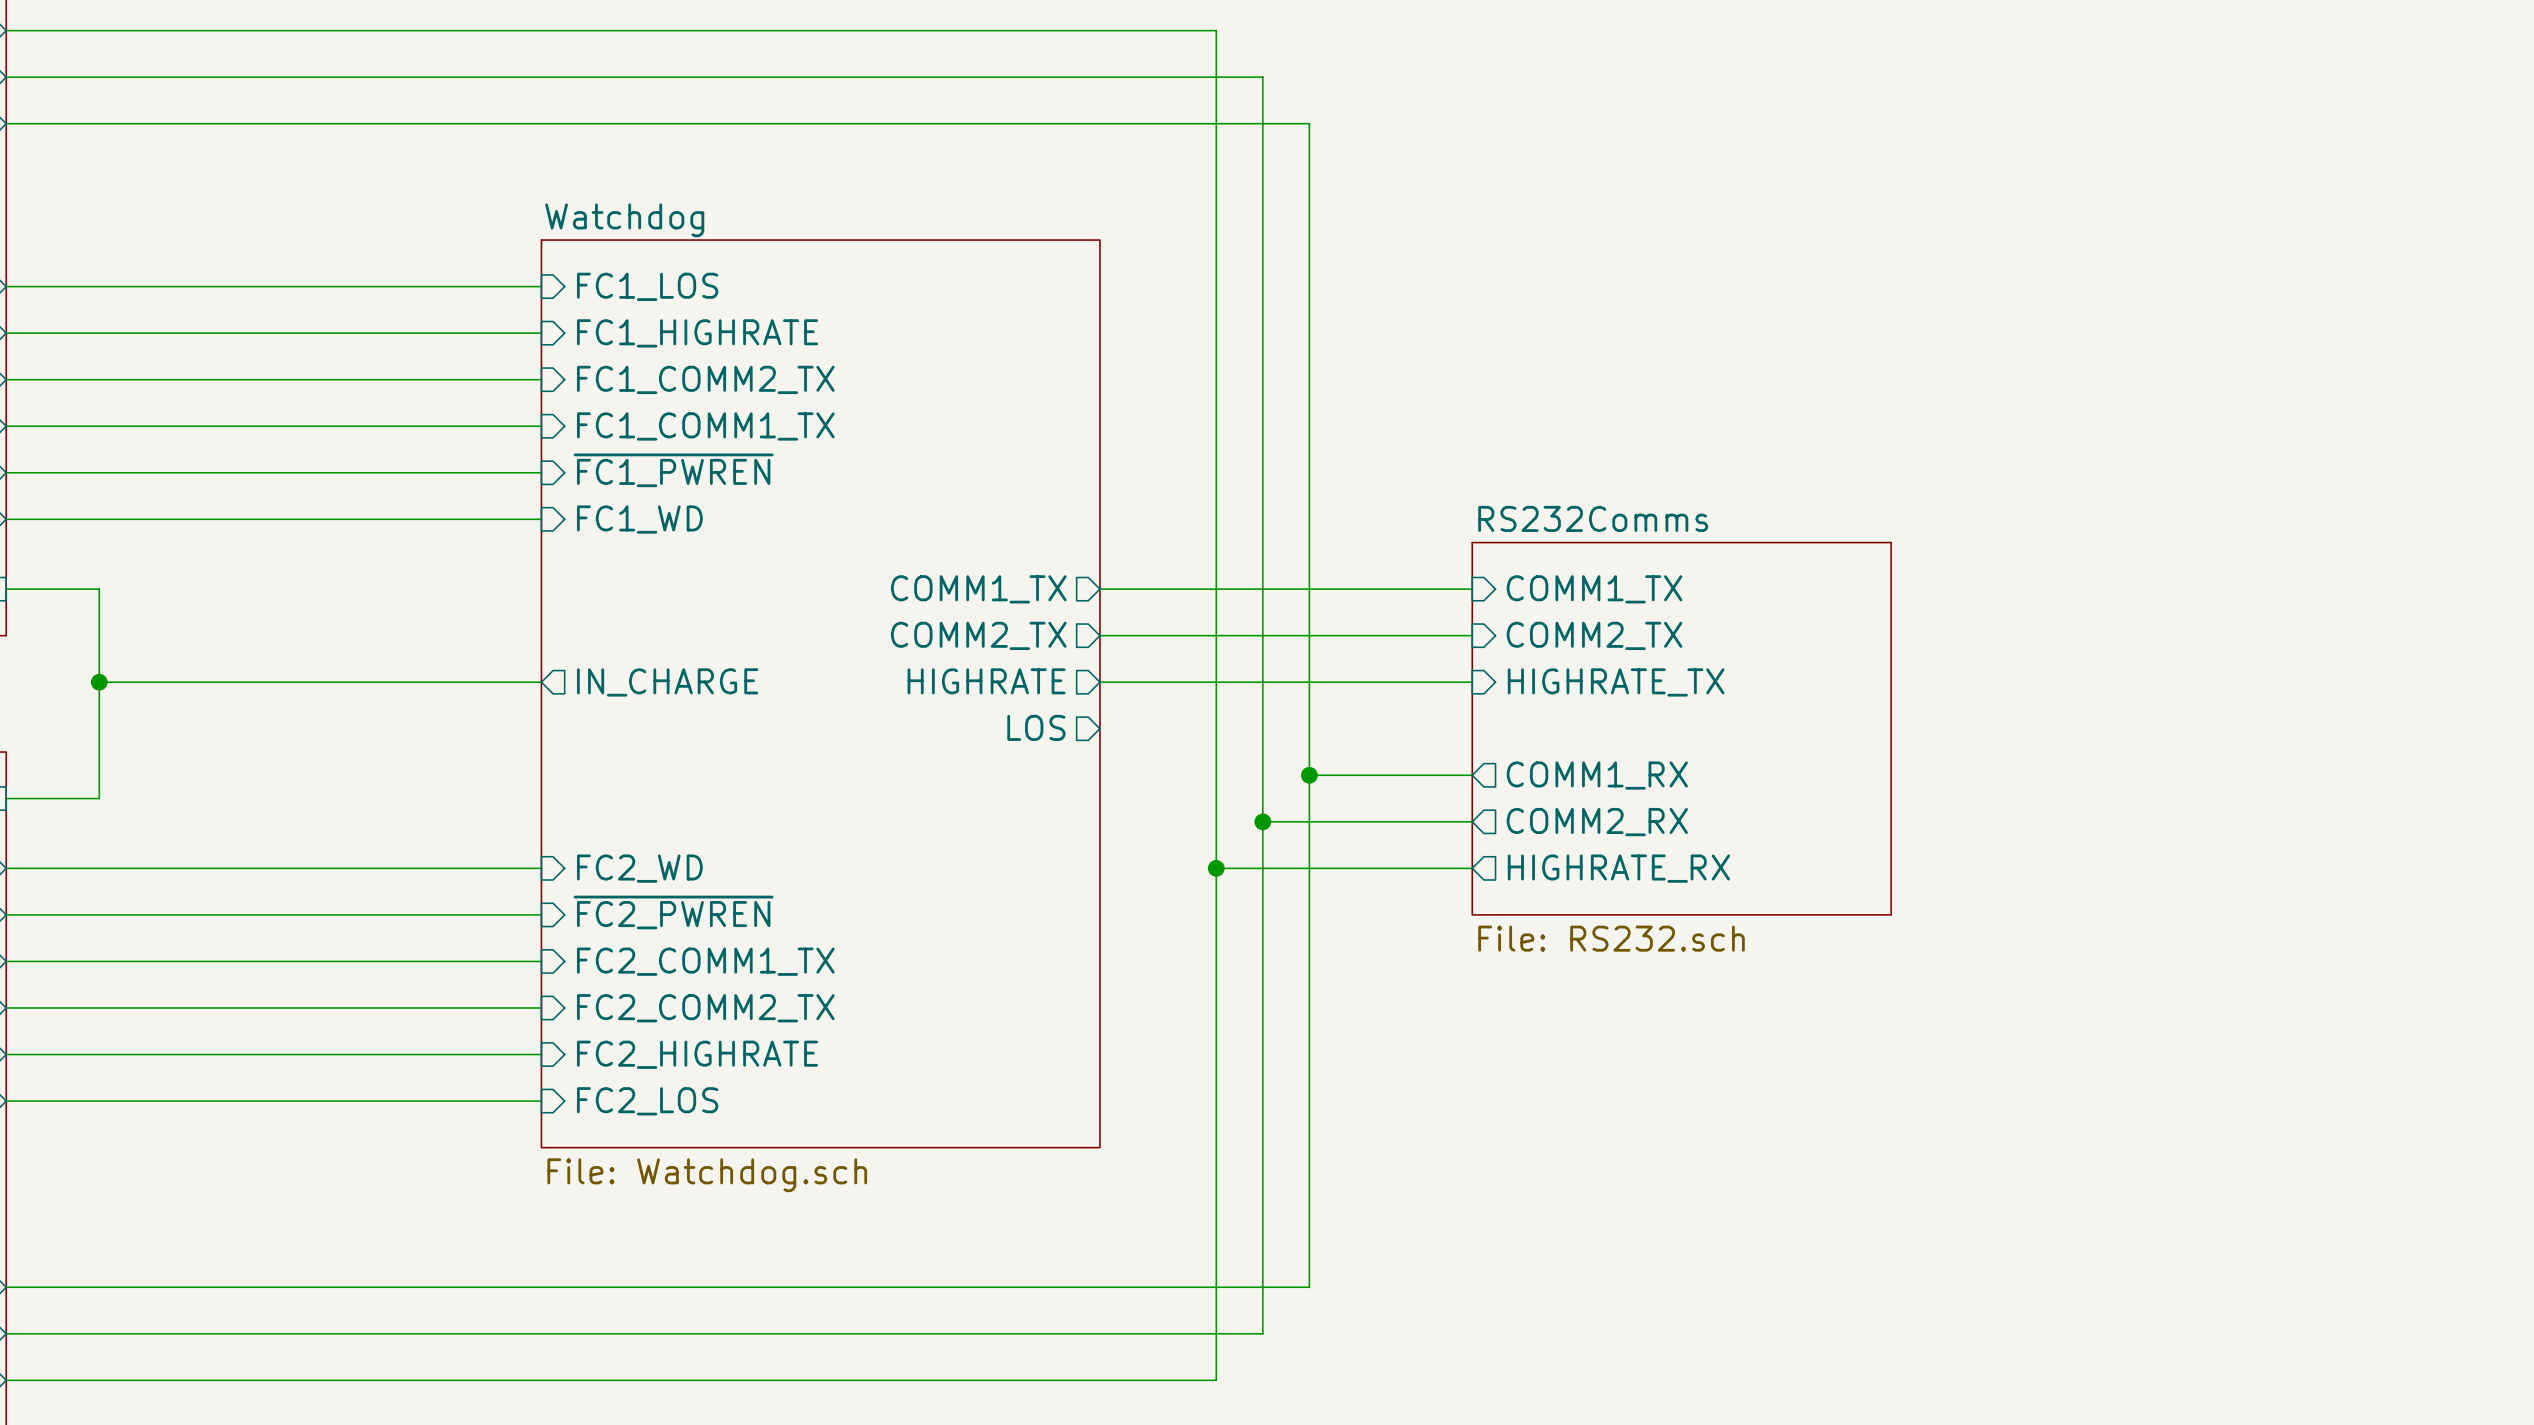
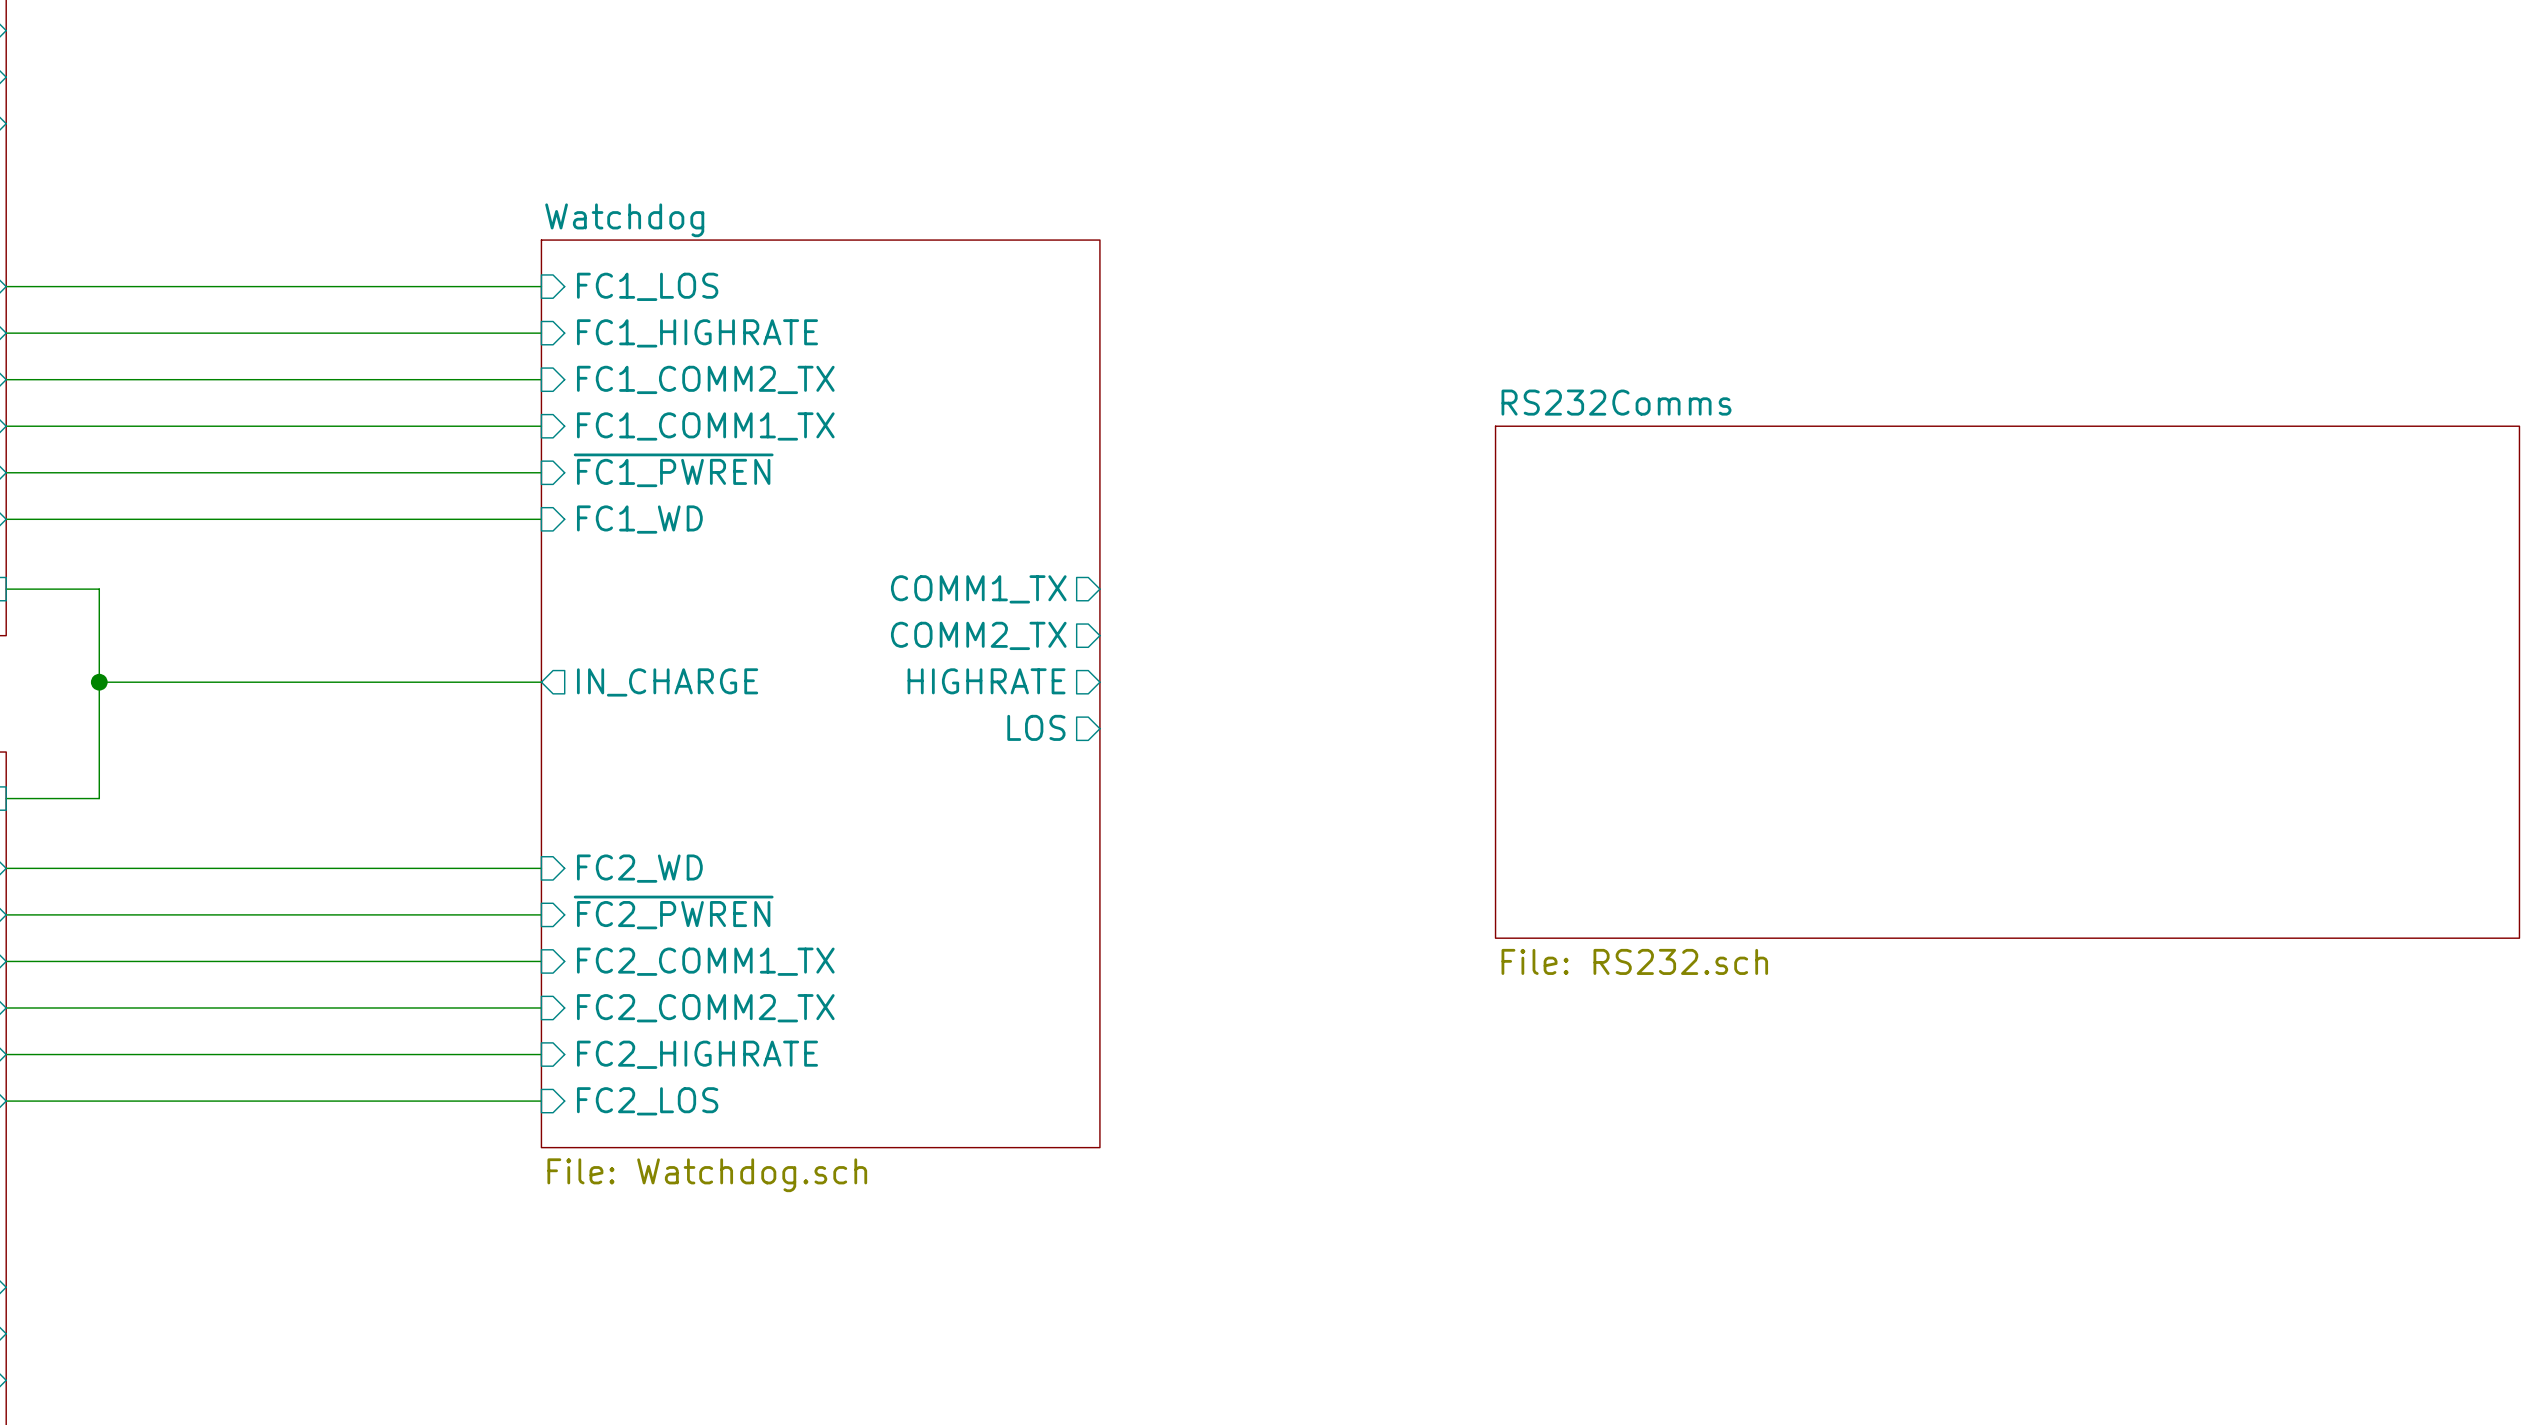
wire: (6, 30) (1216, 30) (1216, 1380) (6, 1380) -> none
wire: (6, 77) (1262, 77) (1262, 1333) (6, 1333) -> none
wire: (6, 123) (1309, 123) (1309, 1287) (6, 1287) -> none
sheet RS232Comms name position: RS232Comms (1593, 518) -> RS232Comms (1616, 402)
sheet RS232Comms shape: [1472, 542, 1892, 915] -> [1495, 426, 2520, 939]
wire: (1099, 589) (1472, 589) -> none
sheet pin: COMM1_TX (1594, 589) -> none
wire: (1099, 635) (1472, 635) -> none
sheet pin: COMM2_TX (1594, 635) -> none
wire: (1099, 682) (1472, 682) -> none
sheet pin: HIGHRATE_TX (1616, 682) -> none
wire: (1309, 775) (1472, 775) -> none
junction: (1309, 775) -> none
sheet pin: COMM1_RX (1597, 775) -> none
wire: (1262, 821) (1472, 821) -> none
junction: (1262, 821) -> none
sheet pin: COMM2_RX (1597, 822) -> none
wire: (1216, 868) (1472, 868) -> none
junction: (1216, 868) -> none
sheet pin: HIGHRATE_RX (1618, 868) -> none
sheet RS232Comms value position: File: RS232.sch (1611, 938) -> File: RS232.sch (1634, 961)

